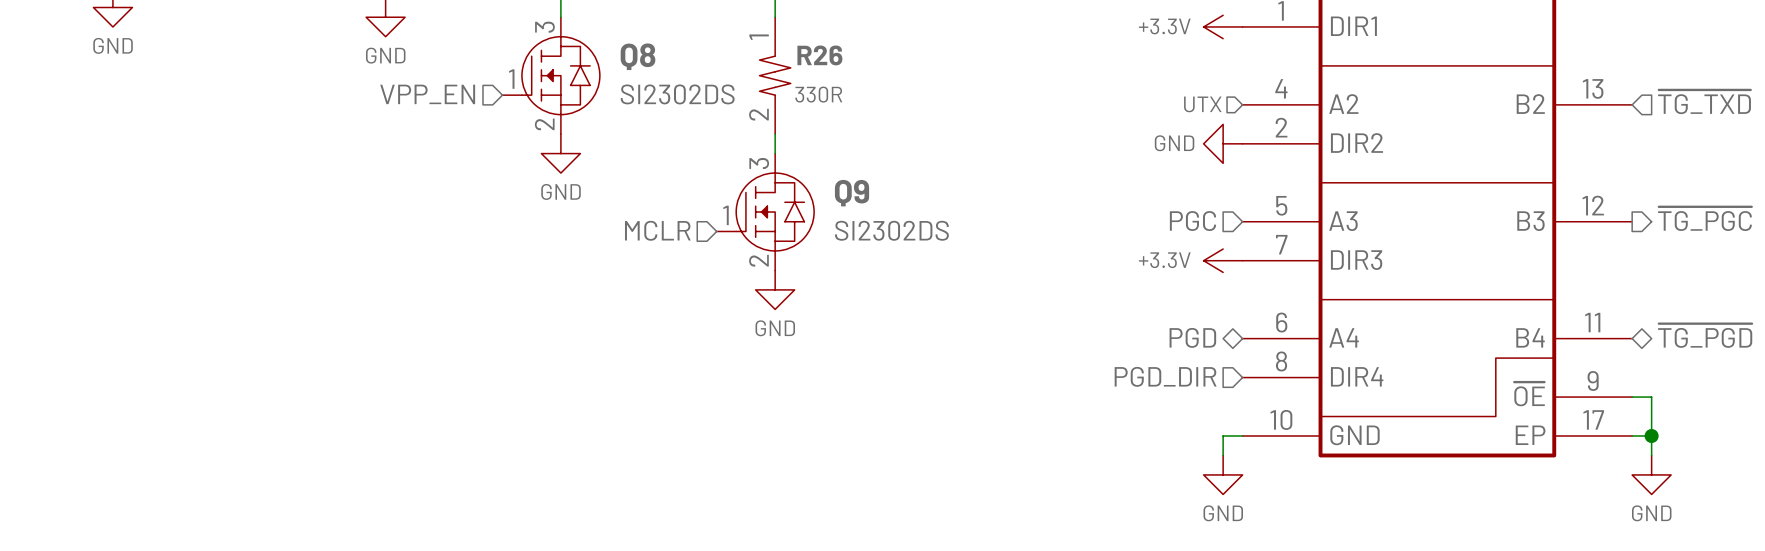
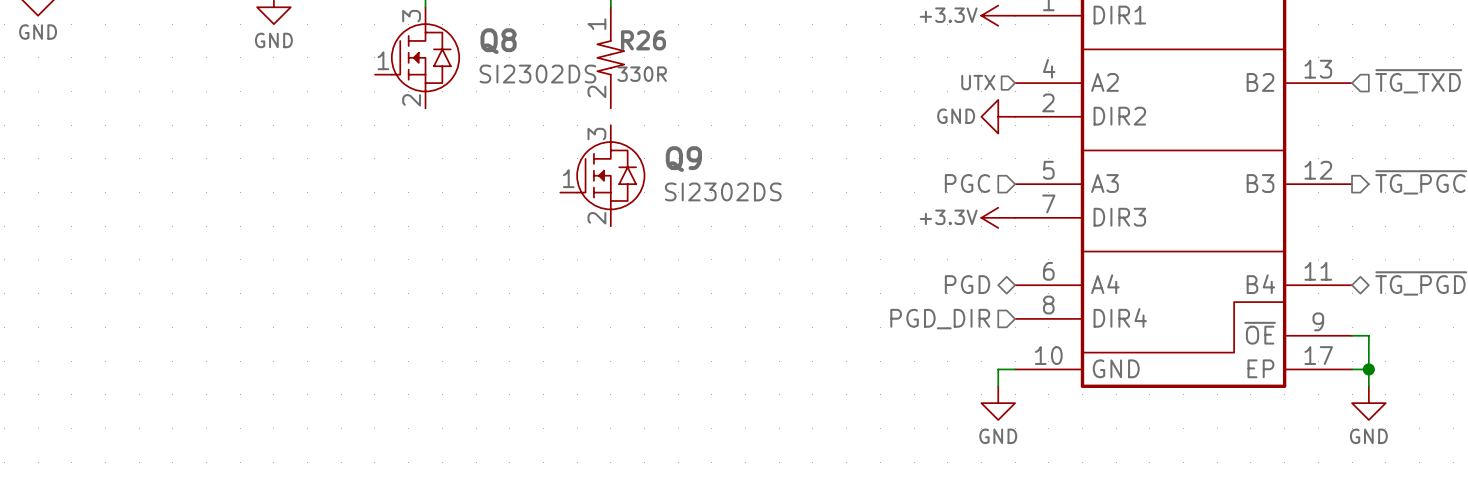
hierarchical label: VPP_EN (427, 94) -> none
wire: (775, 134) (775, 153) -> none
power symbol: GND (560, 153) -> none
hierarchical label: MCLR (657, 230) -> none
power symbol: GND (775, 289) -> none

